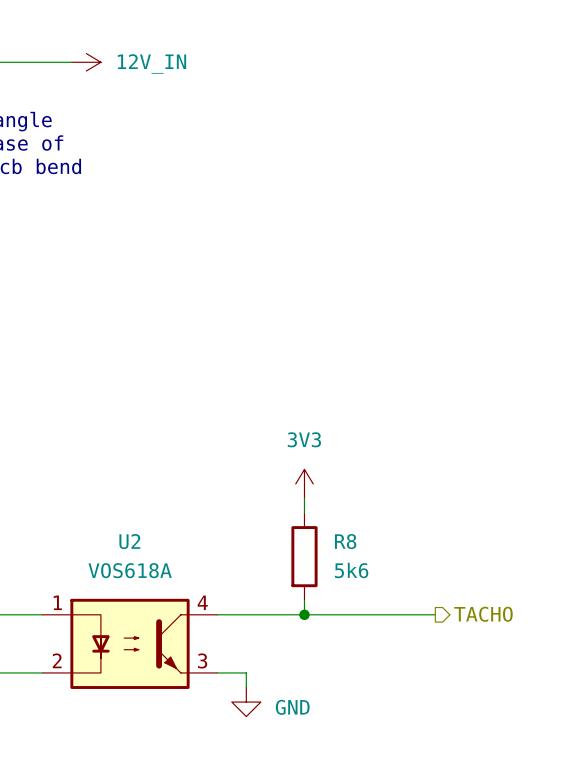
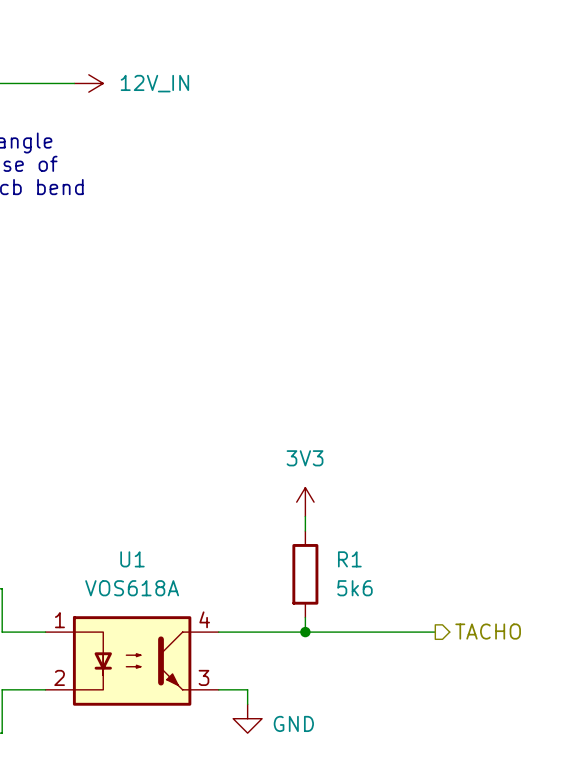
U2 name: U2 (129, 541) -> U1 (132, 559)
R8 name: R8 (345, 541) -> R1 (349, 559)

